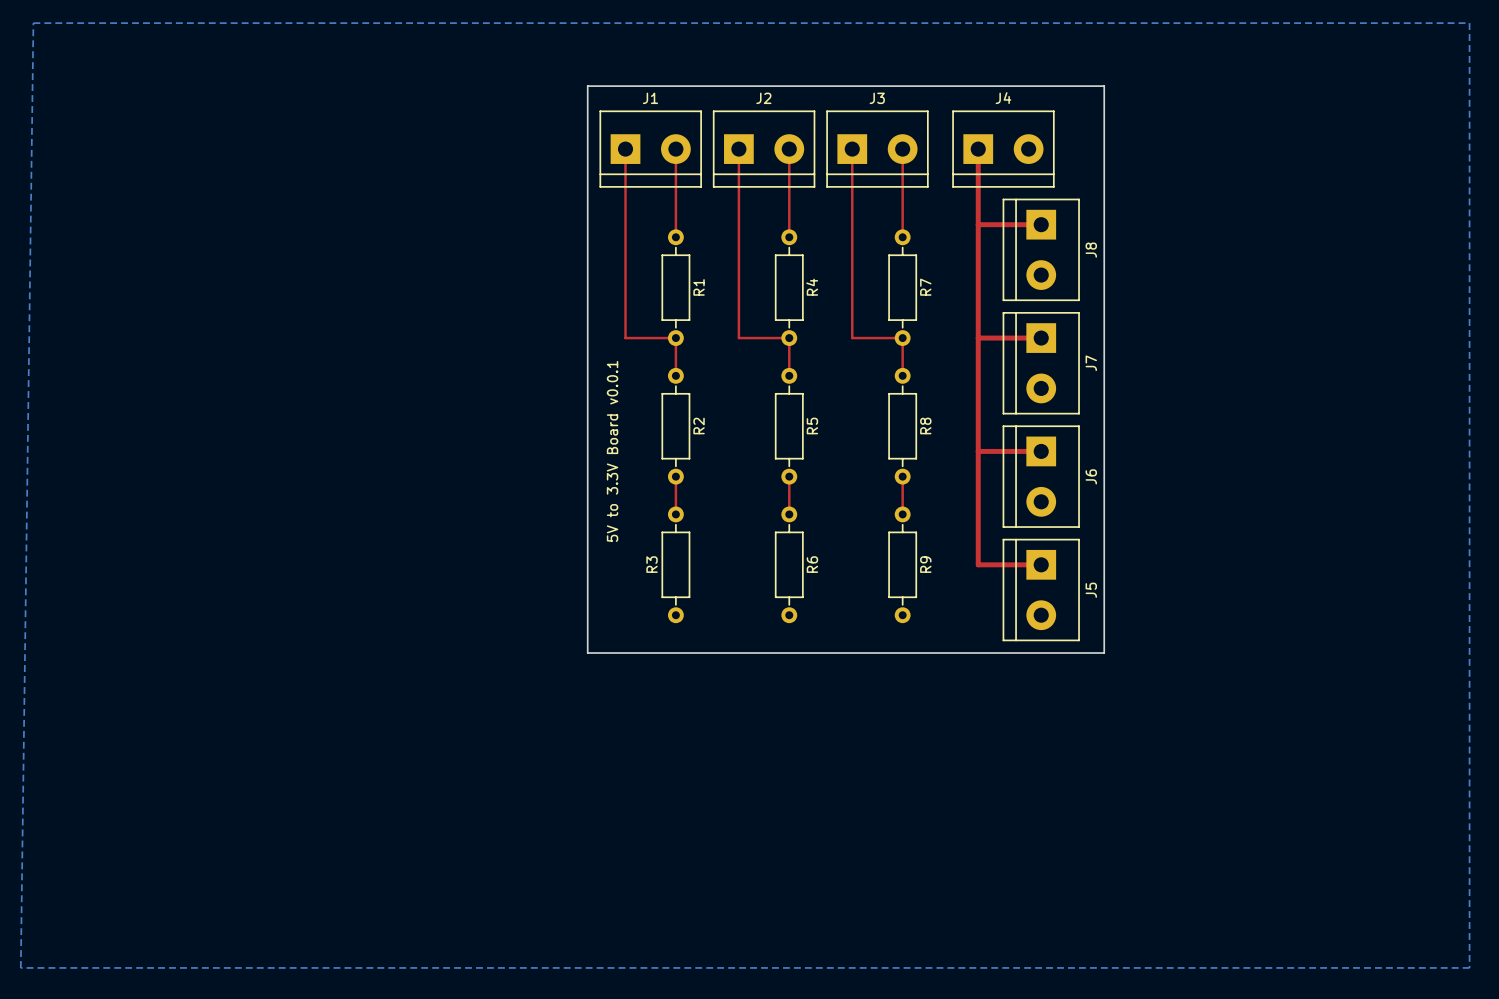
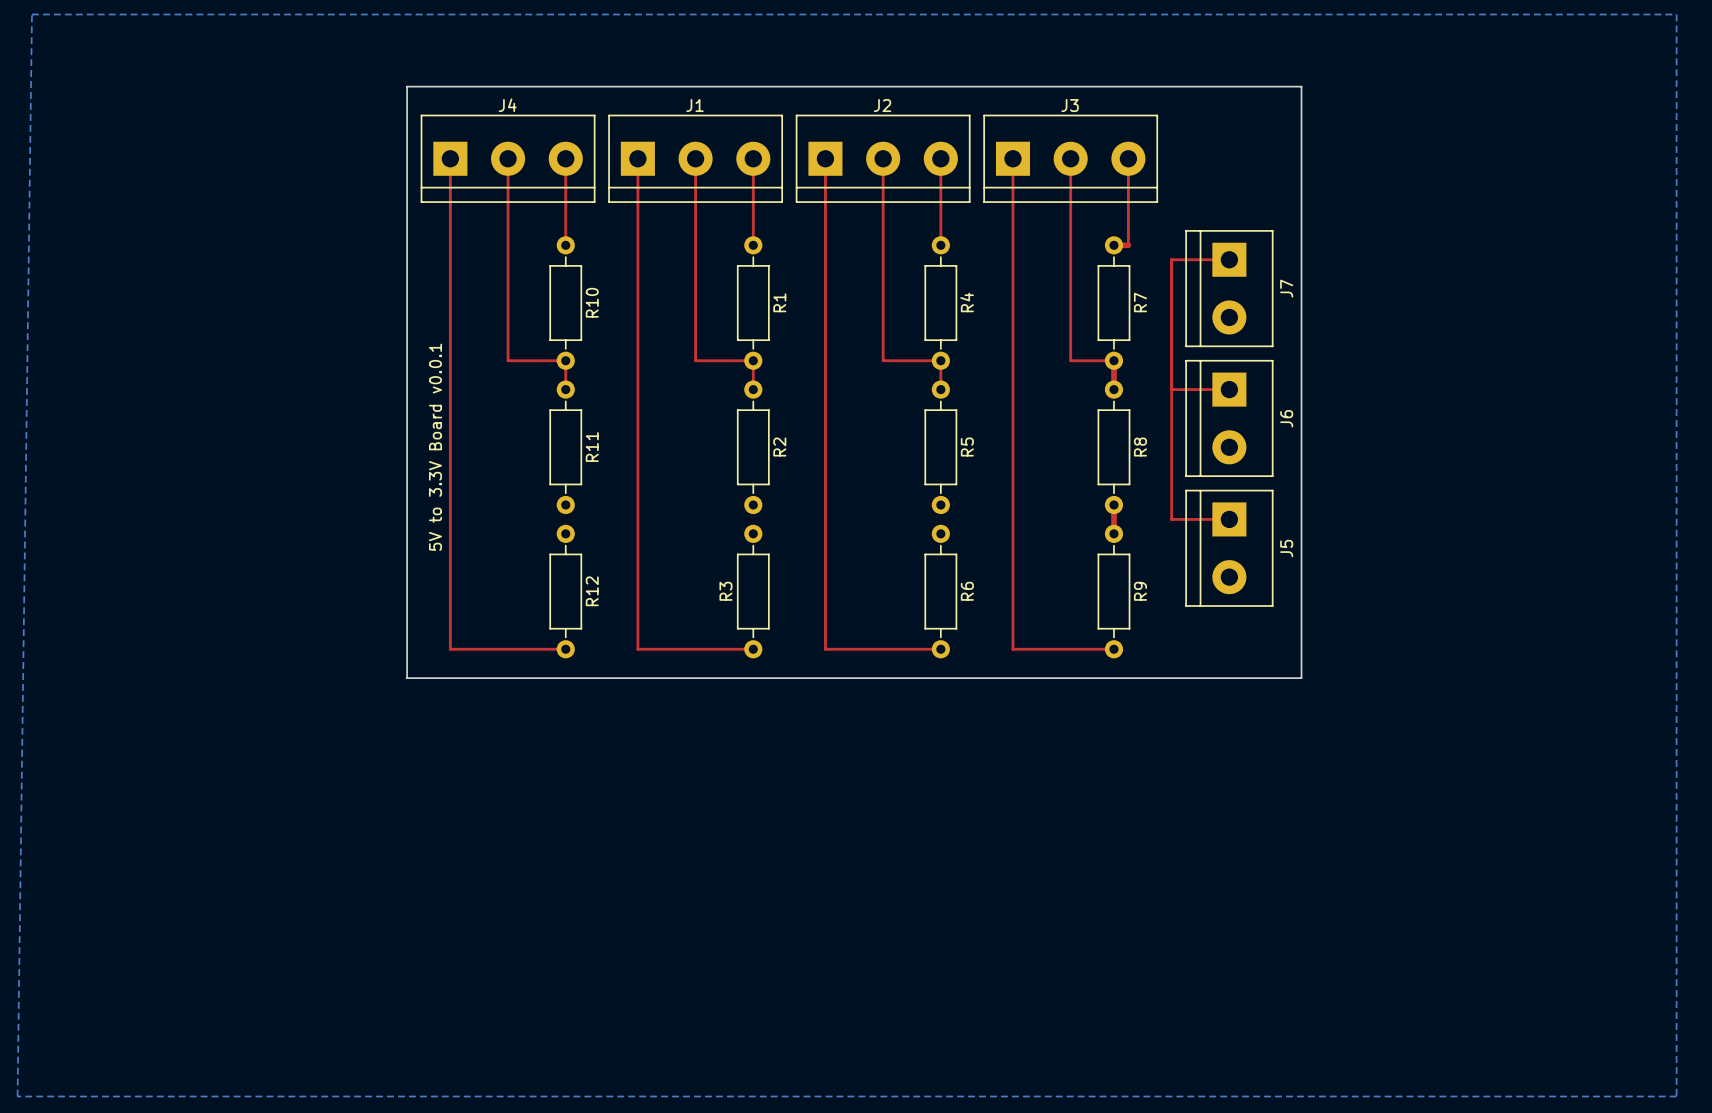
board edge: (587, 86) (587, 653) (1104, 653) (1104, 86) -> (666, 86) (407, 86) (407, 678) (1301, 678) (1301, 86) (1258, 86)
J1 footprint: [599, 110, 702, 188] -> [608, 114, 783, 203]
J2 footprint: [713, 110, 816, 188] -> [795, 114, 971, 203]
J3 footprint: [826, 110, 929, 188] -> [983, 114, 1158, 203]
J4 footprint: [952, 110, 1055, 188] -> [420, 114, 596, 203]
top track: none -> (450, 158) (450, 649) (565, 649)
top track: none -> (508, 158) (508, 360) (565, 360) (565, 389)
top track: none -> (565, 158) (565, 245)
top track: none -> (637, 158) (637, 649) (753, 649)
top track: none -> (695, 158) (695, 360) (753, 360) (753, 389)
top track: (625, 149) (625, 338) (675, 338) (675, 375) -> none
top track: none -> (753, 158) (753, 245)
top track: (675, 149) (675, 237) -> none
top track: none -> (825, 158) (825, 649) (940, 649)
top track: (738, 149) (738, 338) (789, 338) (789, 375) -> none
top track: none -> (883, 158) (883, 360) (940, 360) (940, 389)
top track: (789, 149) (789, 237) -> none
top track: none -> (940, 158) (940, 245)
top track: (852, 149) (852, 338) (902, 338) (902, 375) -> none
top track: none -> (1012, 158) (1012, 649) (1113, 649)
top track: (902, 149) (902, 237) -> none
top track: (978, 149) (978, 325) -> (1070, 158) (1070, 360) (1113, 360)
top track: (990, 224) (1041, 224) -> (1128, 245) (1128, 158)
top track: none -> (1229, 259) (1171, 259) (1171, 519) (1229, 519)
J8: (1041, 249) -> none
R10: none -> (565, 303)
R1 position: (675, 287) -> (753, 303)
R4 position: (789, 287) -> (940, 303)
R7 position: (902, 287) -> (1113, 303)
top track: (978, 338) (1041, 338) -> none
top track: (978, 350) (978, 451) (1041, 451) -> none
top track: none -> (1171, 389) (1229, 389)
J7 position: (1041, 363) -> (1229, 288)
R11: none -> (565, 447)
R2 position: (675, 426) -> (753, 447)
R5 position: (789, 426) -> (940, 447)
R8 position: (902, 426) -> (1113, 447)
text position: 5V to 3.3V Board v0.0.1 (612, 451) -> 5V to 3.3V Board v0.0.1 (435, 447)
top track: (675, 476) (675, 514) -> none
top track: (789, 476) (789, 514) -> none
top track: (902, 476) (902, 514) -> none
top track: (978, 476) (978, 564) (1041, 564) -> none
J6 position: (1041, 476) -> (1229, 418)
R12: none -> (565, 591)
R3 position: (675, 564) -> (753, 591)
R6 position: (789, 564) -> (940, 591)
R9 position: (902, 564) -> (1113, 591)
J5 position: (1041, 590) -> (1229, 548)

